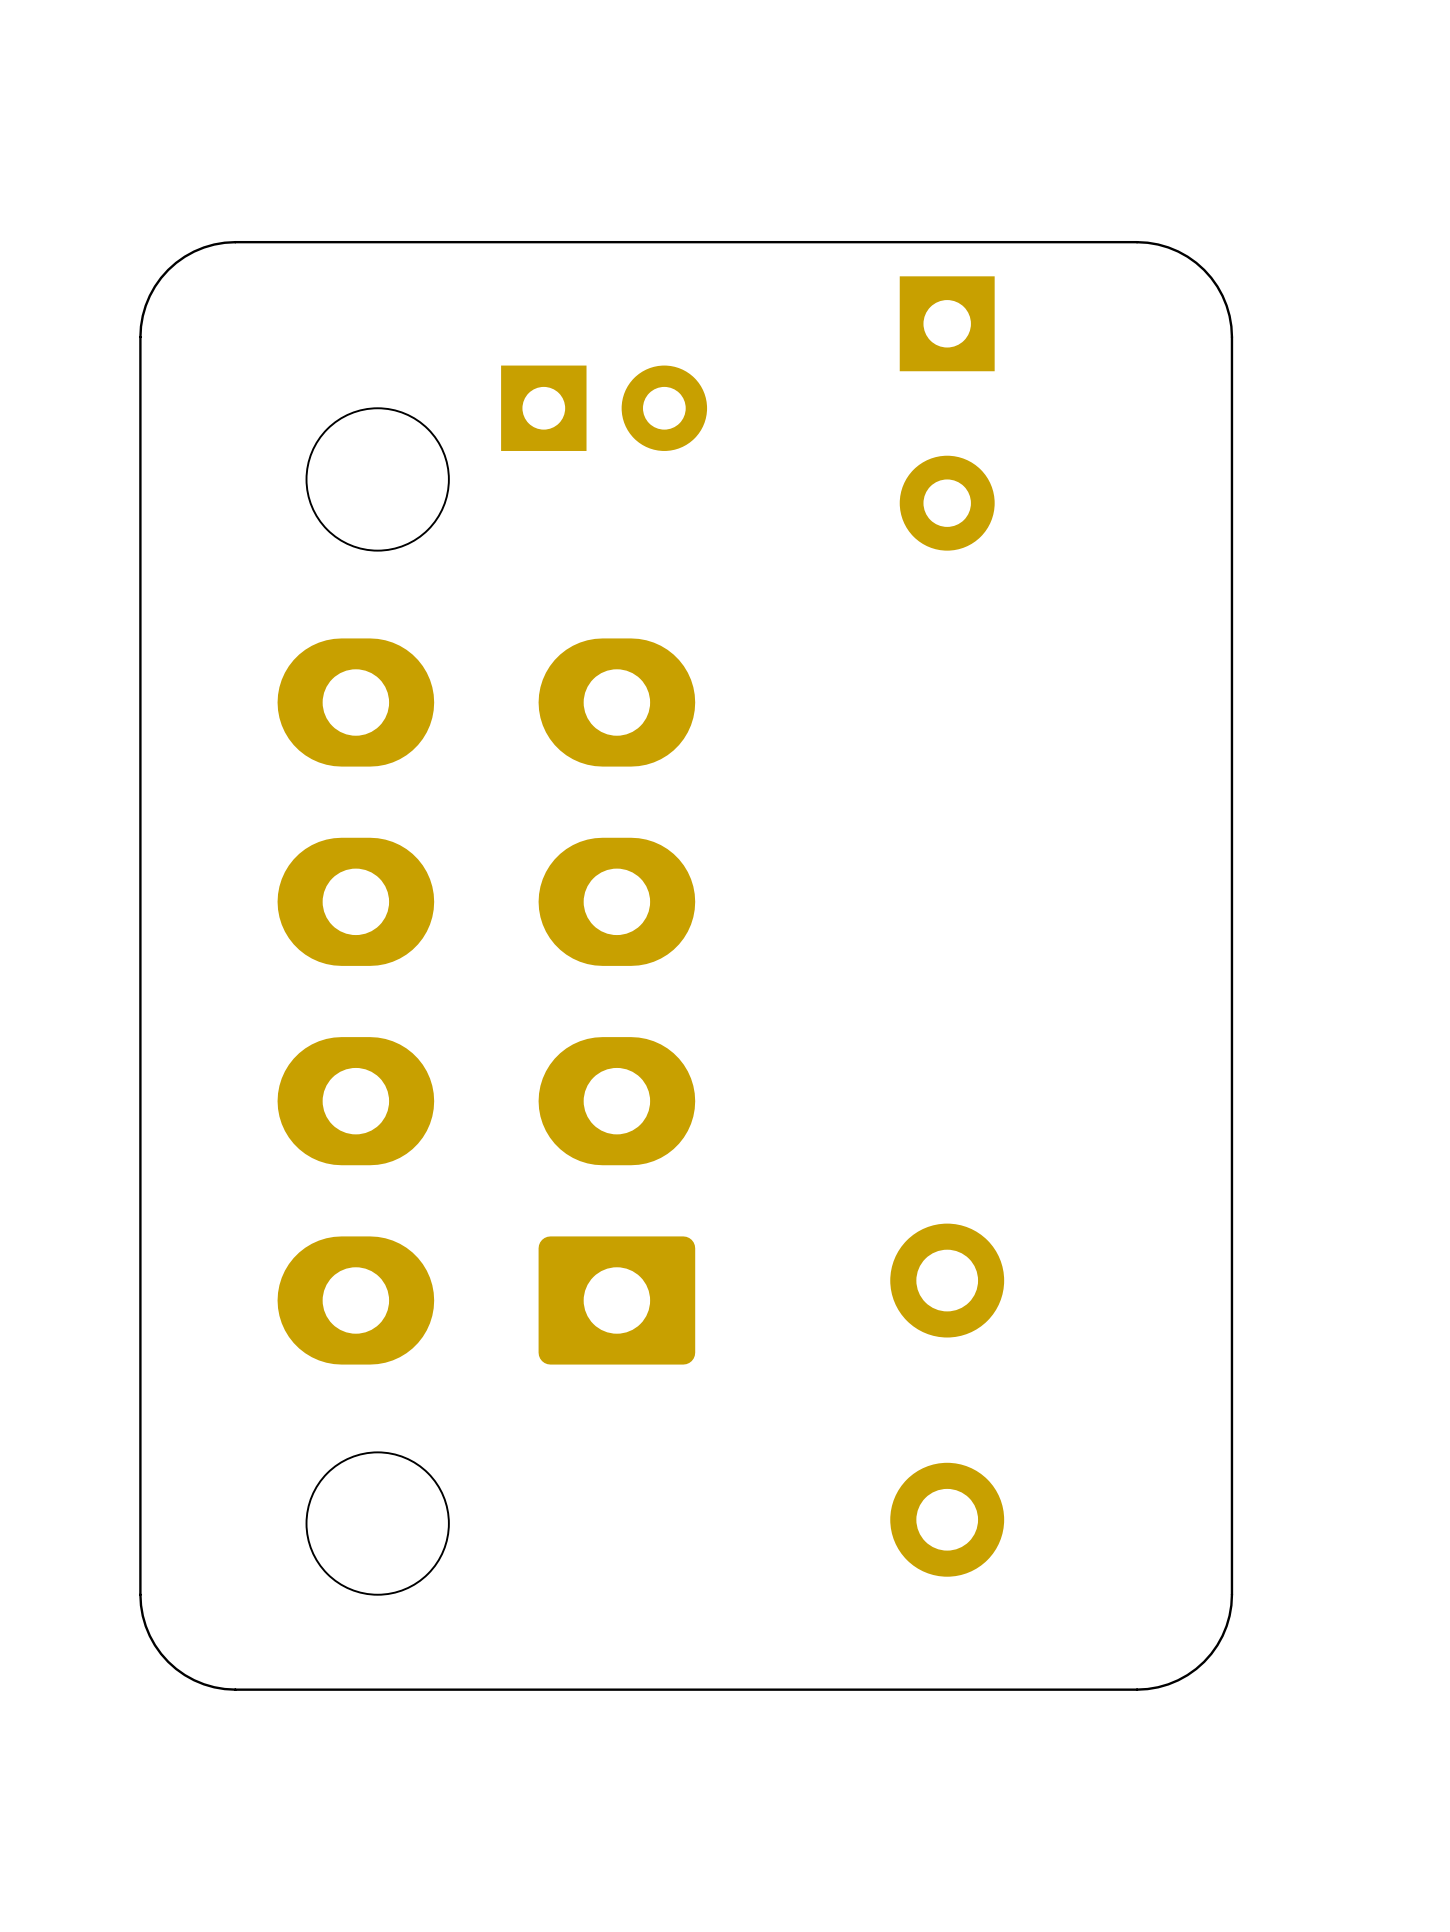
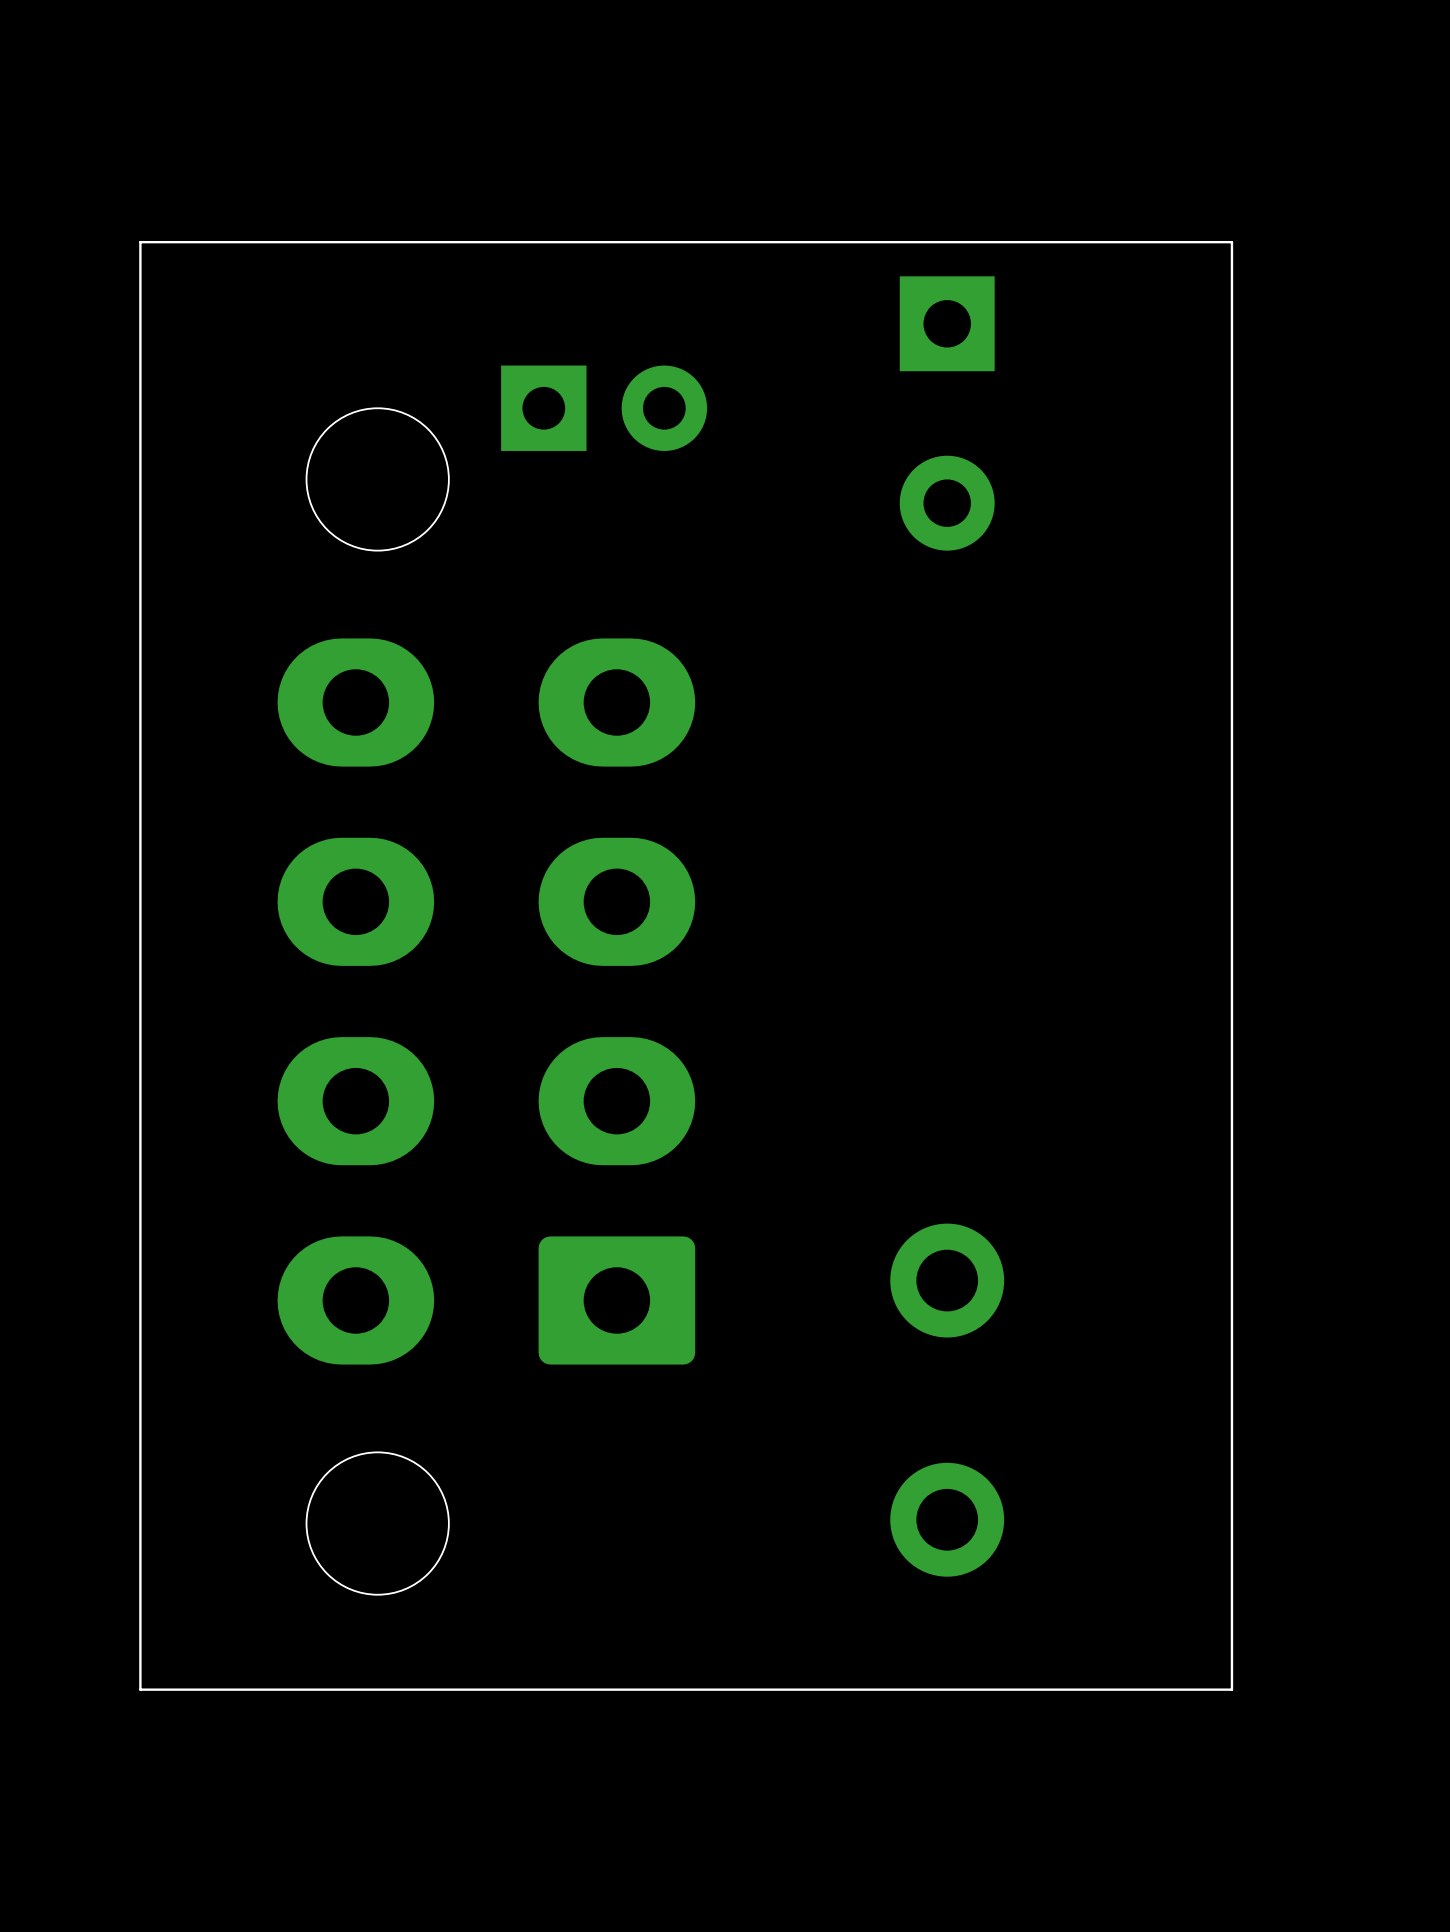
board edge: (235, 242) (203, 247) (184, 256) (168, 269) (149, 295) (142, 315) (140, 337) -> (235, 242) (140, 242) (140, 337)
board edge: (1137, 242) (1168, 247) (1187, 256) (1204, 269) (1222, 295) (1229, 315) (1231, 337) -> (1137, 242) (1231, 242) (1231, 337)
board edge: (140, 1594) (145, 1626) (154, 1645) (168, 1661) (194, 1680) (214, 1687) (235, 1689) -> (140, 1594) (140, 1689) (235, 1689)
board edge: (1231, 1594) (1229, 1615) (1222, 1635) (1204, 1661) (1178, 1680) (1158, 1687) (1137, 1689) -> (1231, 1594) (1231, 1689) (1137, 1689)

